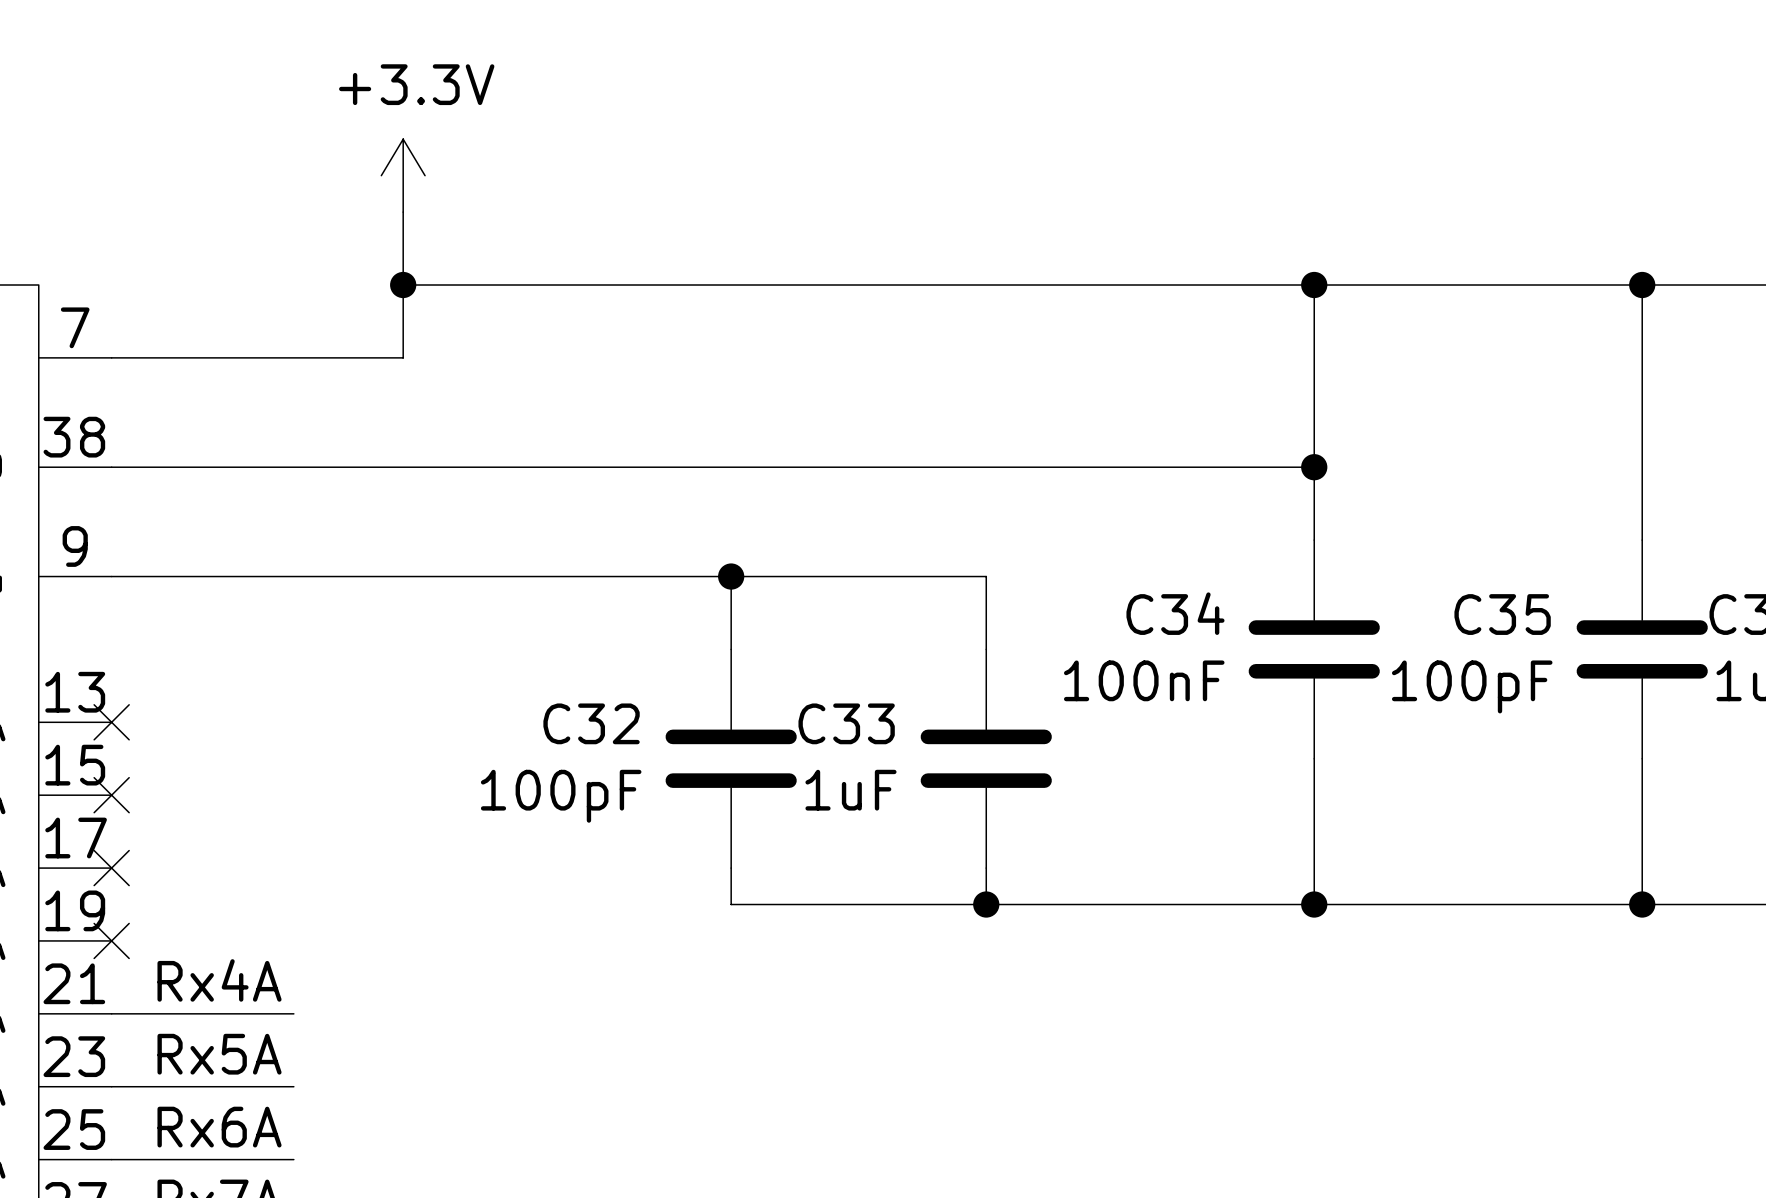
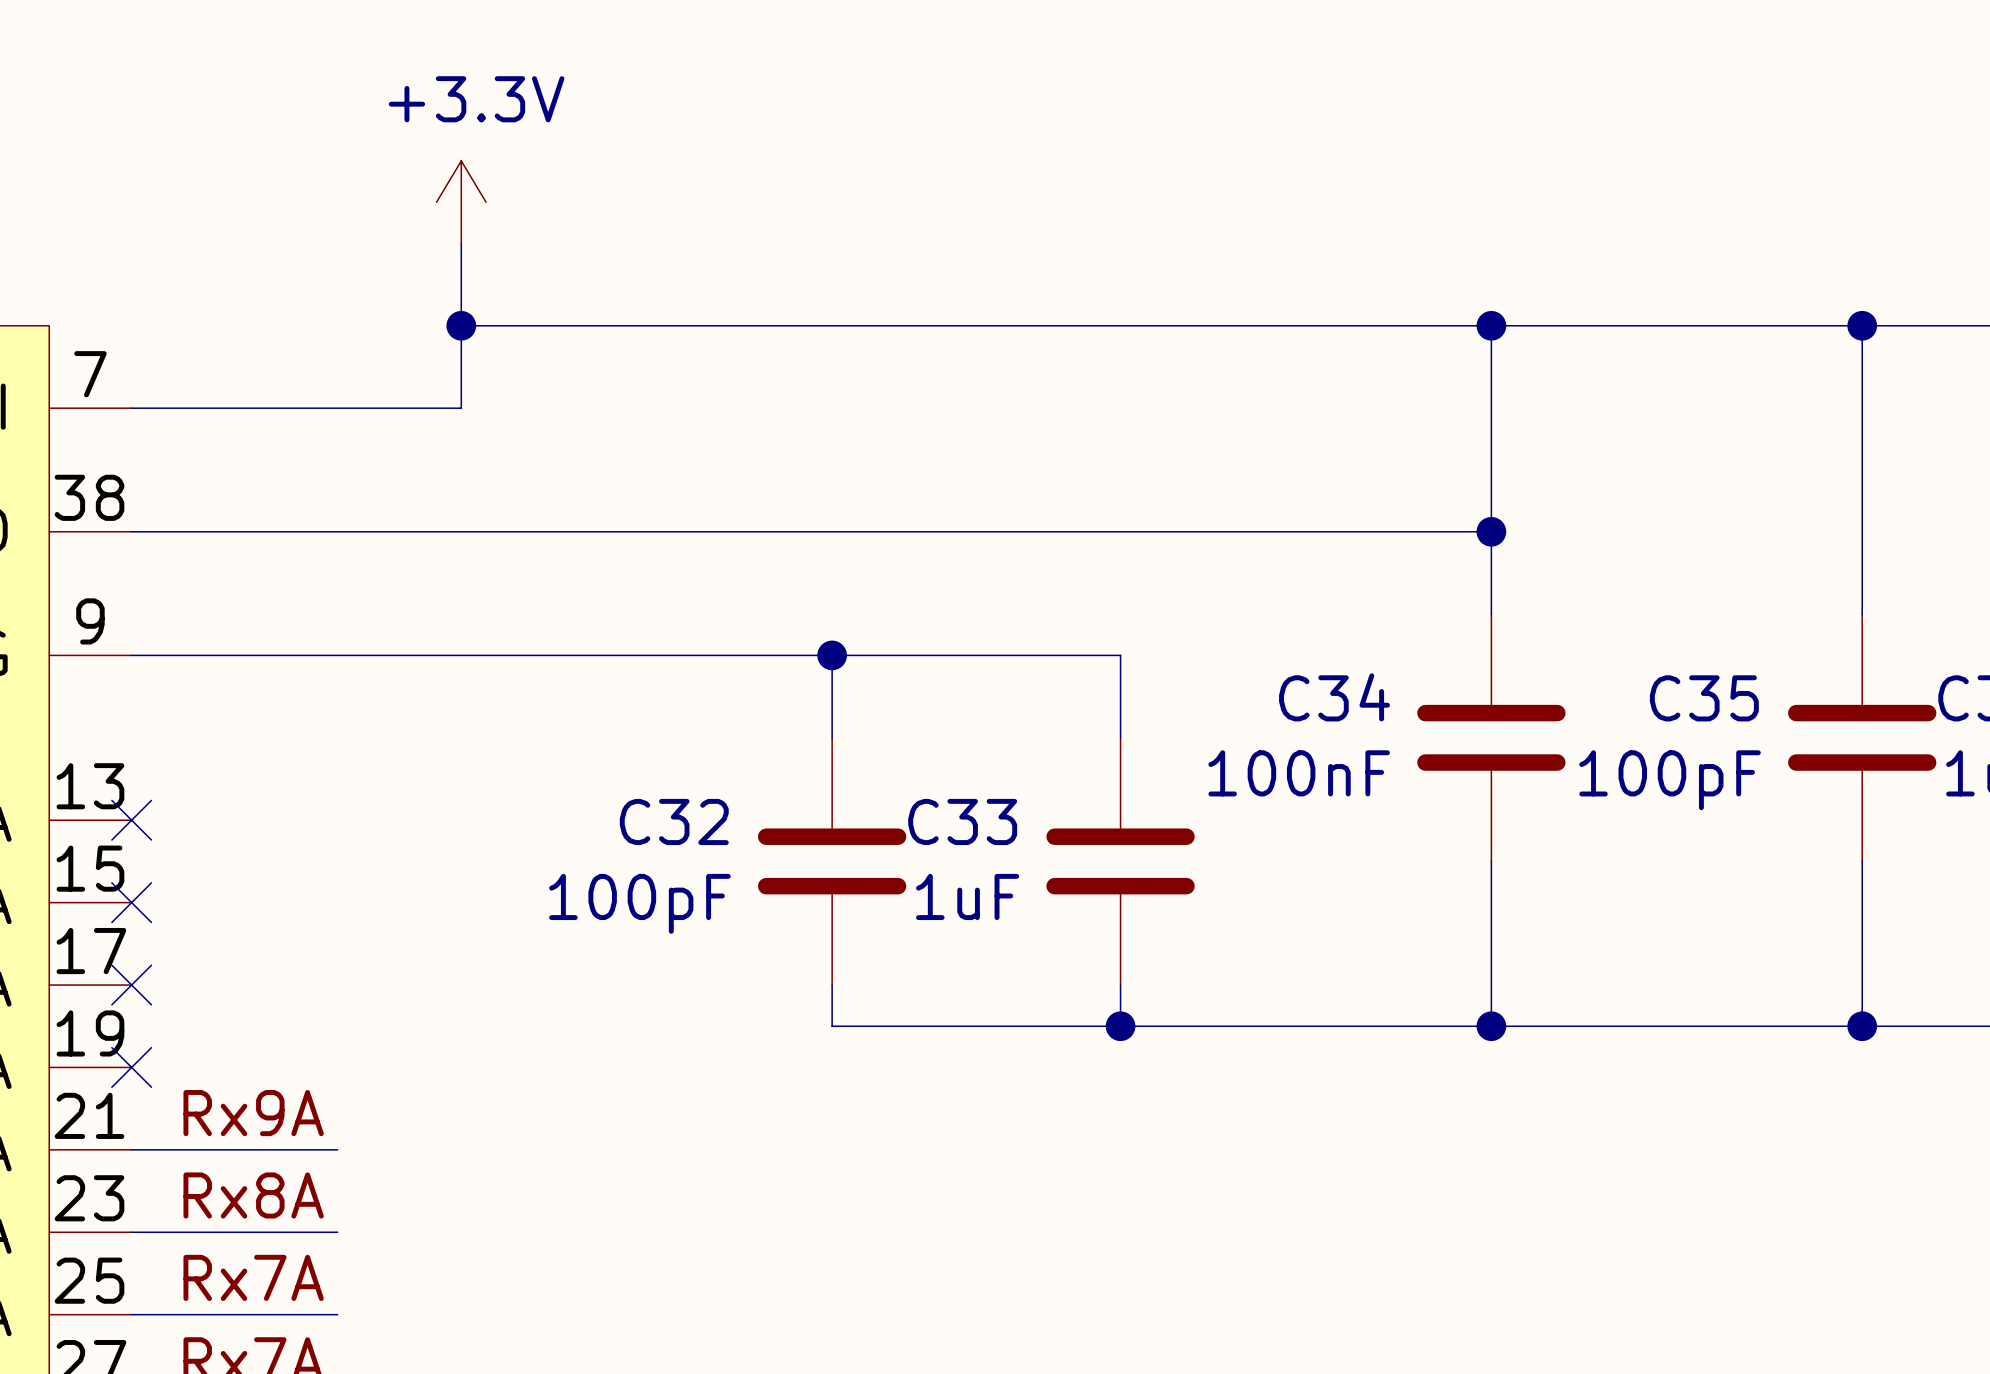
label: Rx4A (219, 980) -> Rx9A (253, 1113)
label: Rx5A (219, 1054) -> Rx8A (253, 1195)
label: Rx6A (219, 1127) -> Rx7A (253, 1277)

